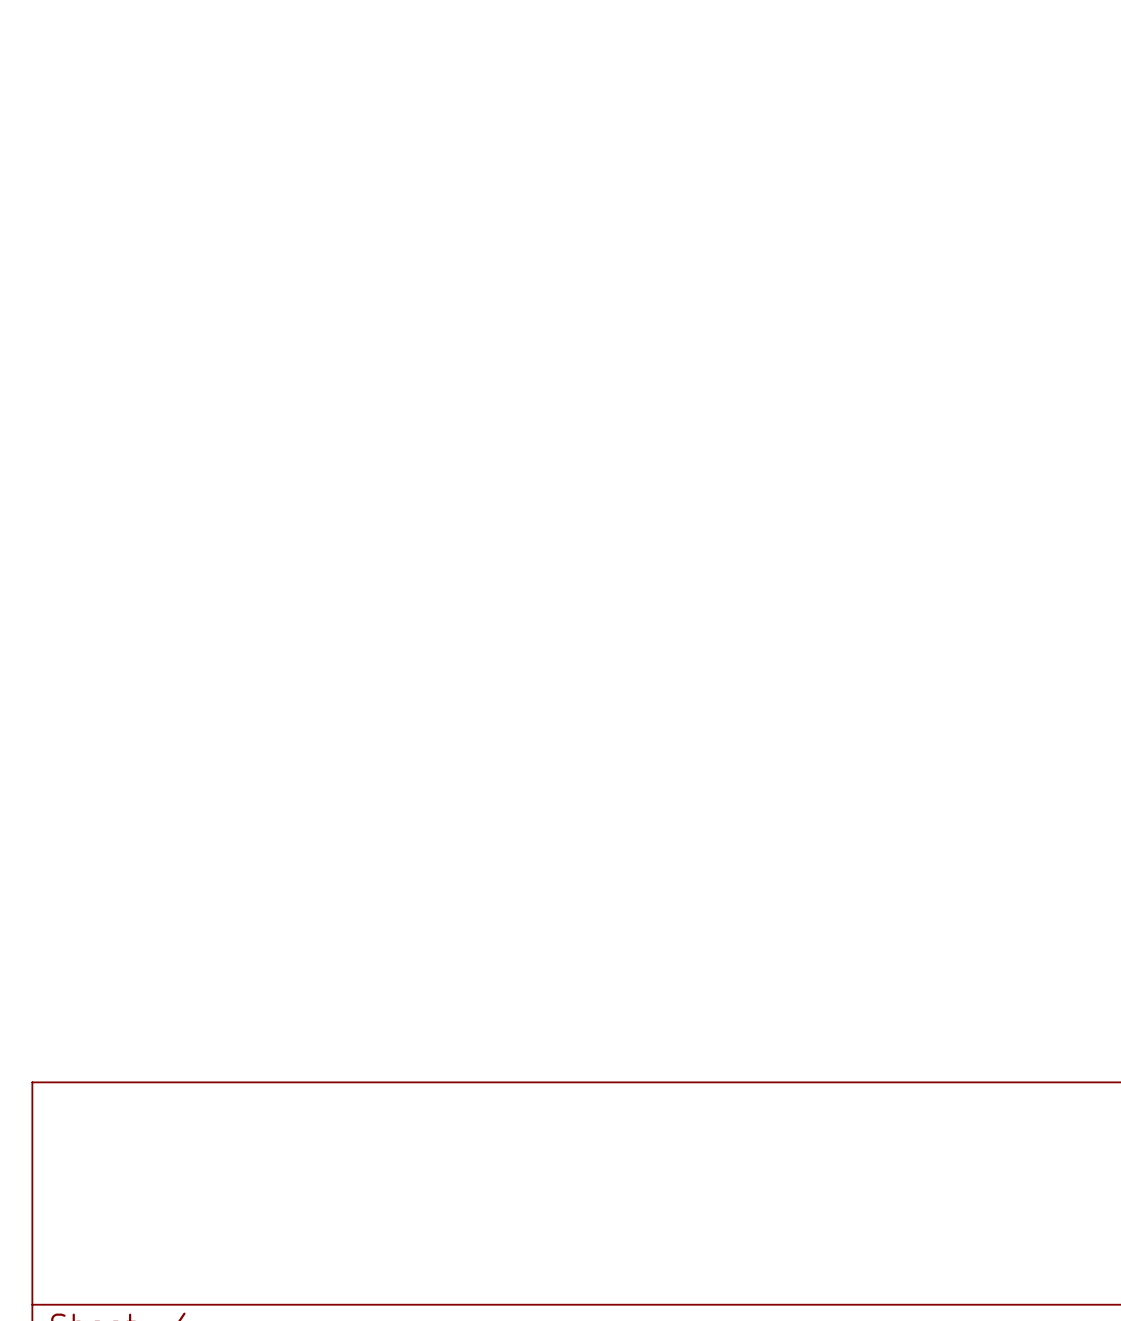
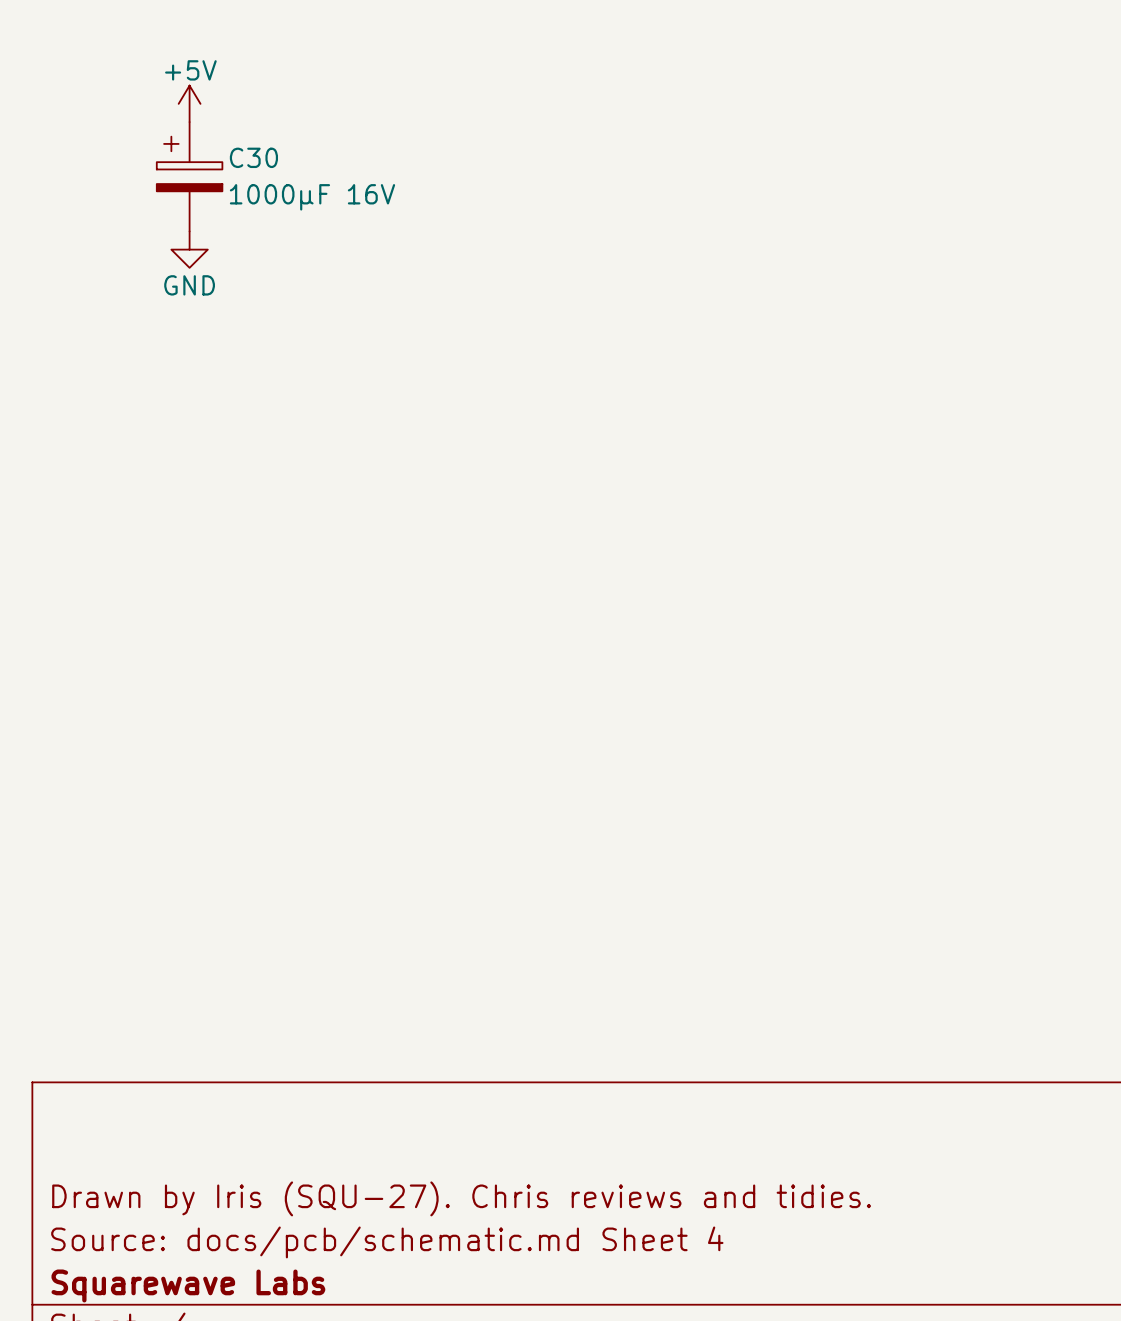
power symbol: none -> +5V (189, 103)
C30: none -> 1000µF 16V (189, 176)
power symbol: none -> GND (189, 249)
title block: none -> Drawn by Iris (SQU-27). Chris reviews and tidies. (461, 1198)
title block: none -> Source: docs/pcb/schematic.md Sheet 4 (387, 1242)
title block: none -> Squarewave Labs (188, 1285)

